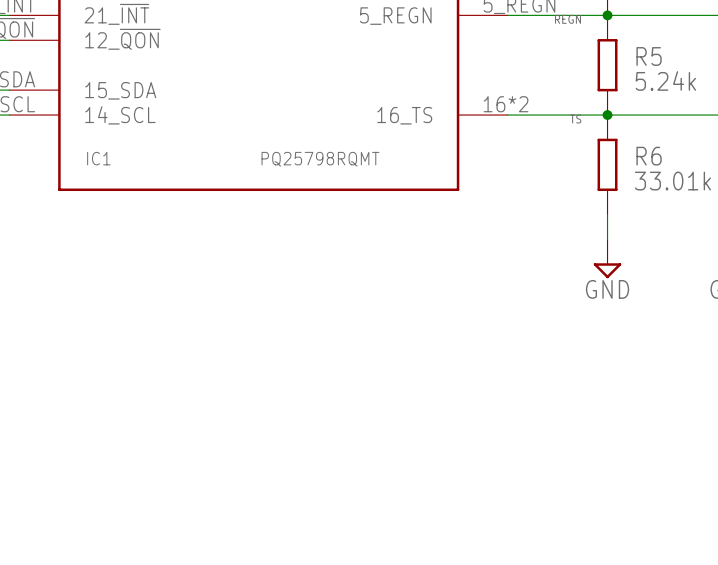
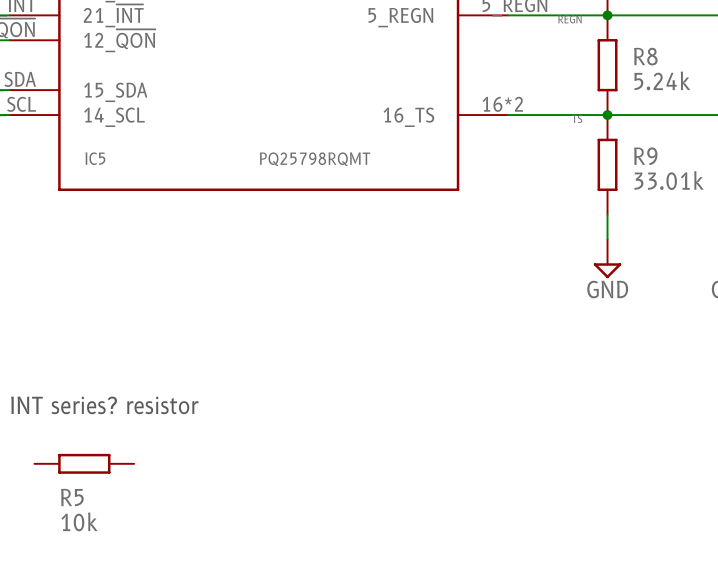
R5 name: R5 (649, 56) -> R8 (645, 56)
R6 name: R6 (649, 156) -> R9 (645, 156)
IC1 name: IC1 (98, 158) -> IC5 (95, 158)
text: none -> INT series? resistor (104, 405)
R5: none -> 10k (84, 463)

